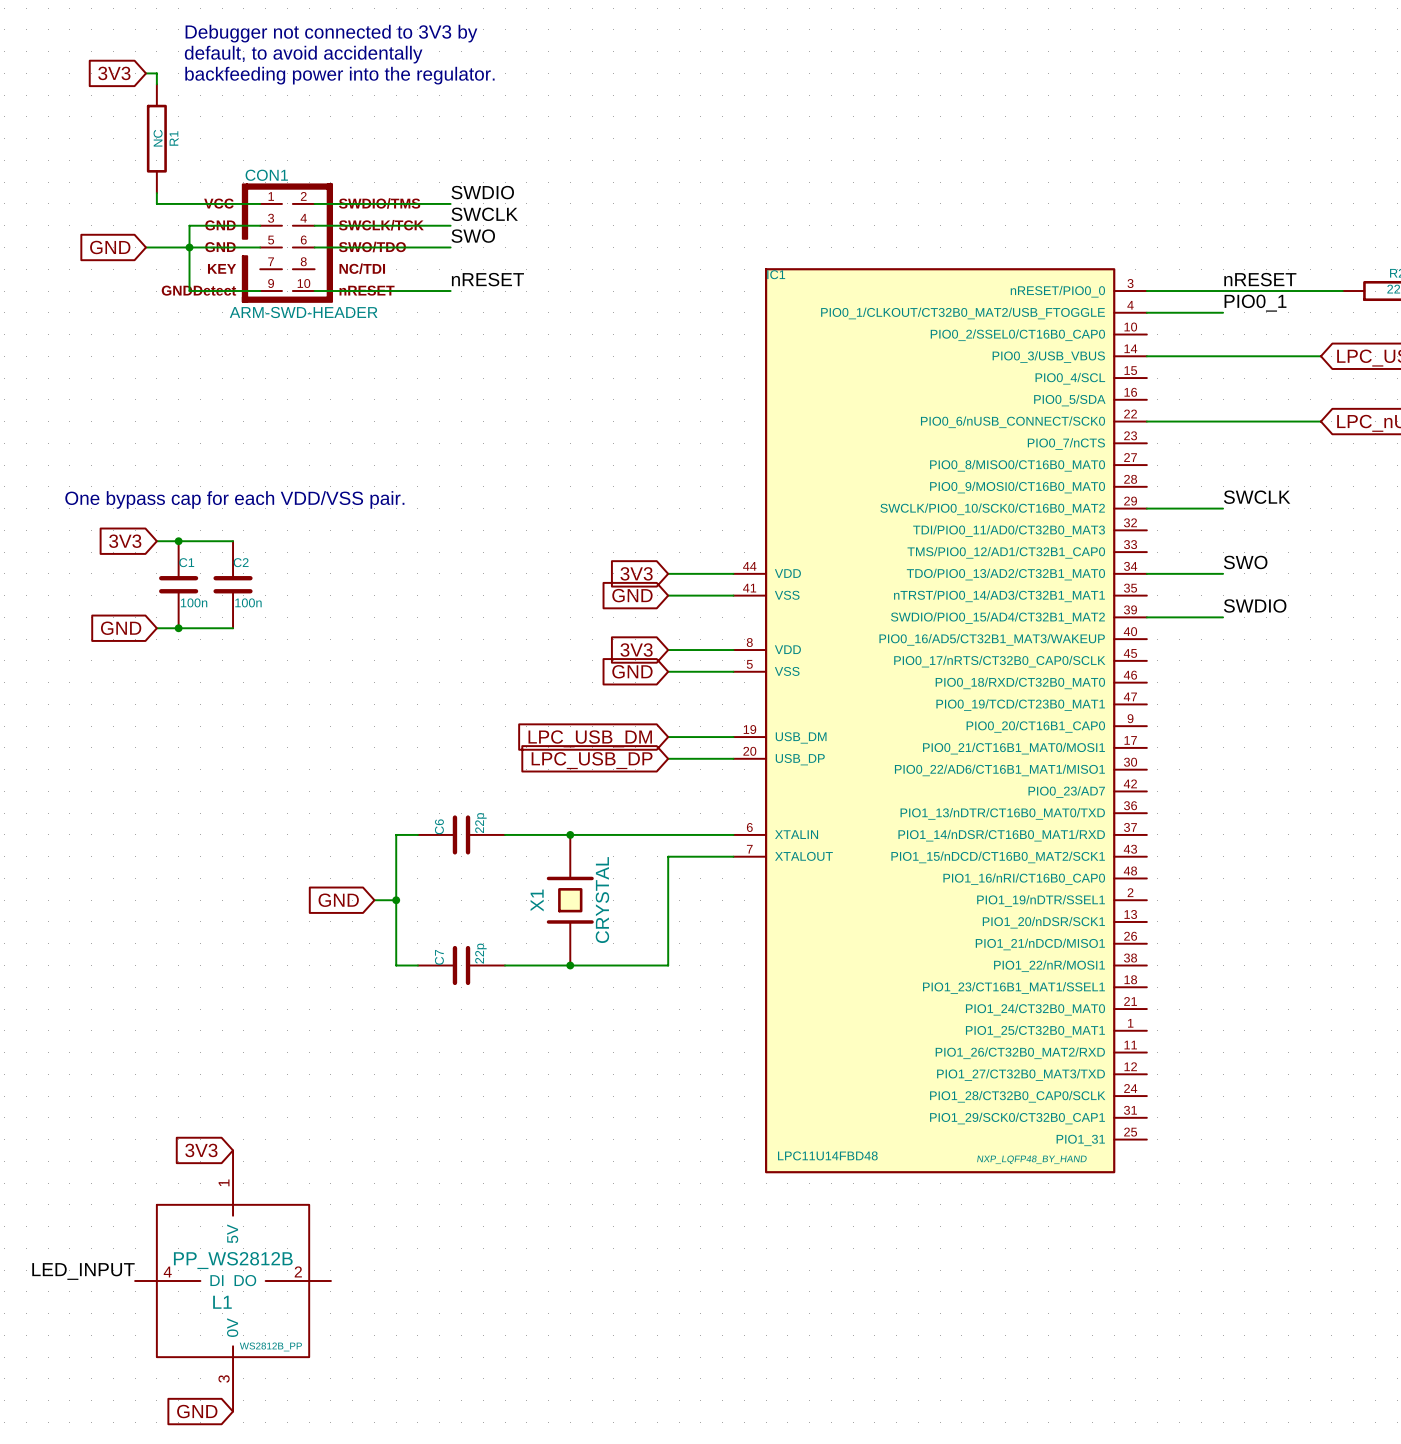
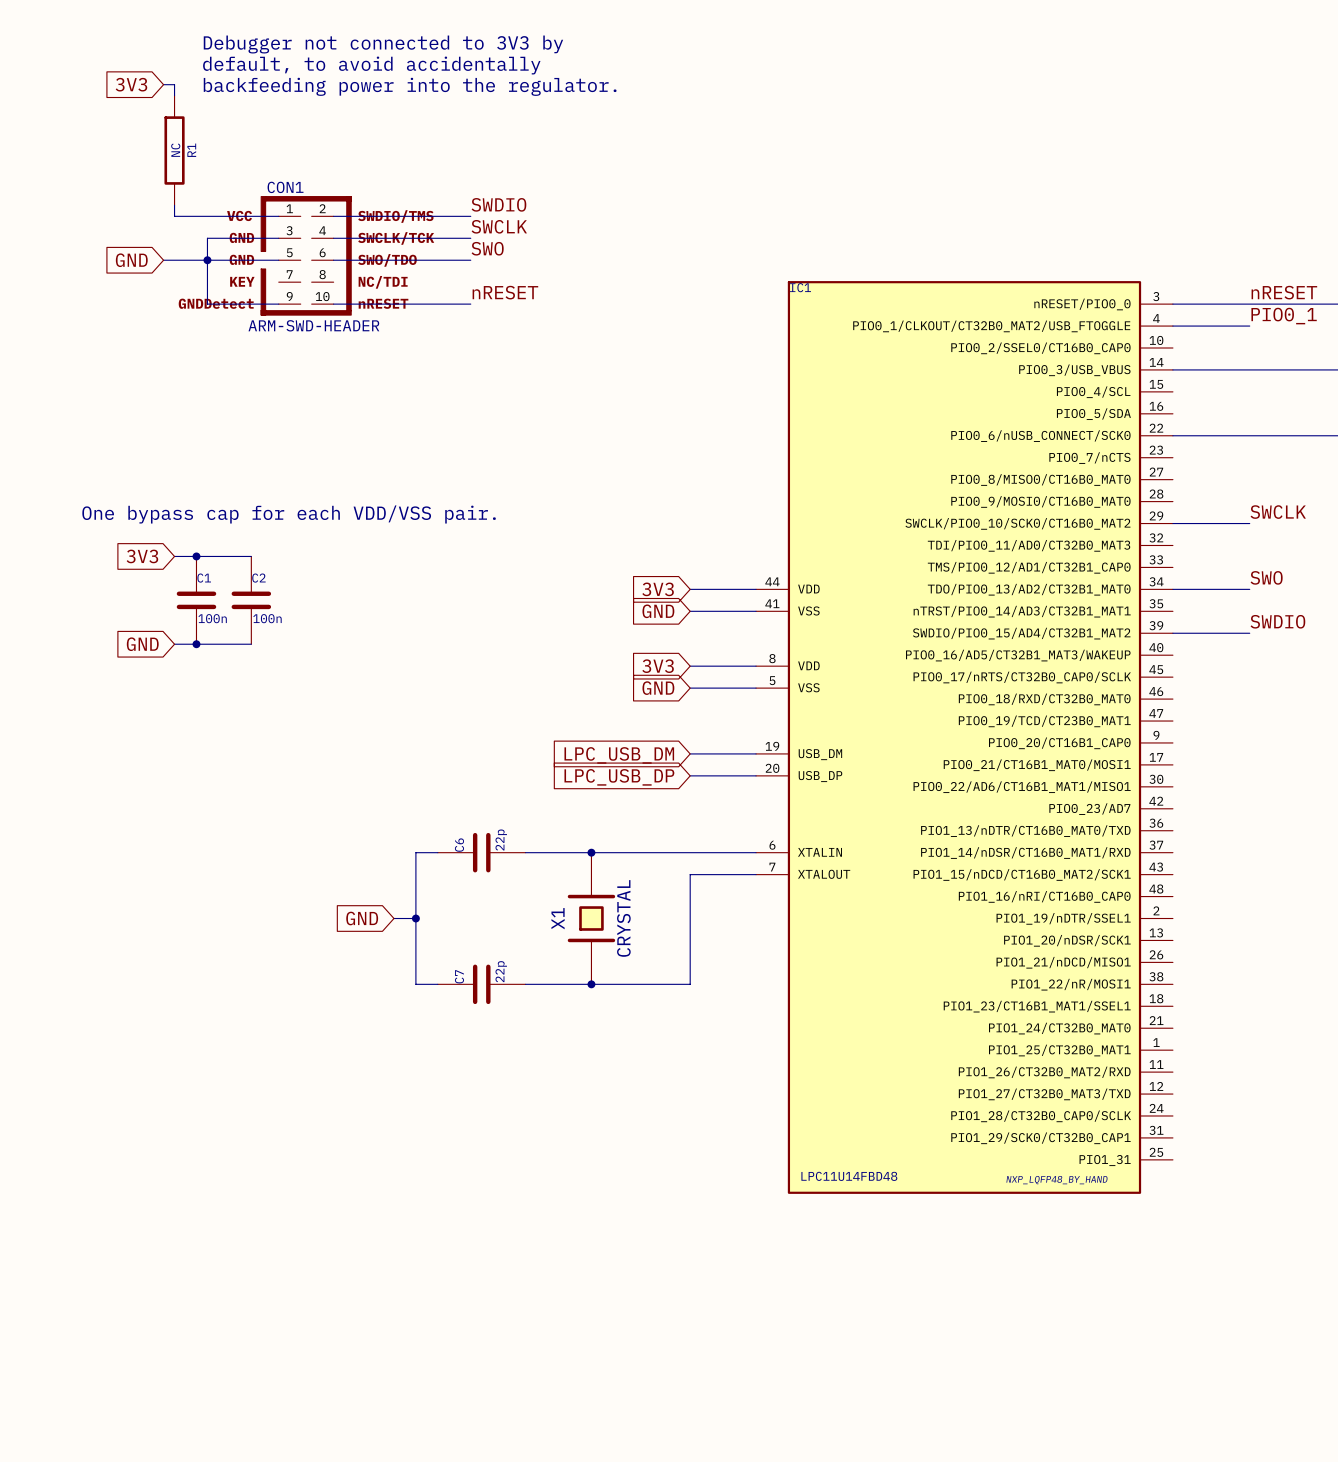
global label: 3V3 (201, 1150) -> none
label: LED_INPUT (83, 1271) -> none
L1: PP_WS2812B (233, 1281) -> none
global label: GND (197, 1411) -> none

